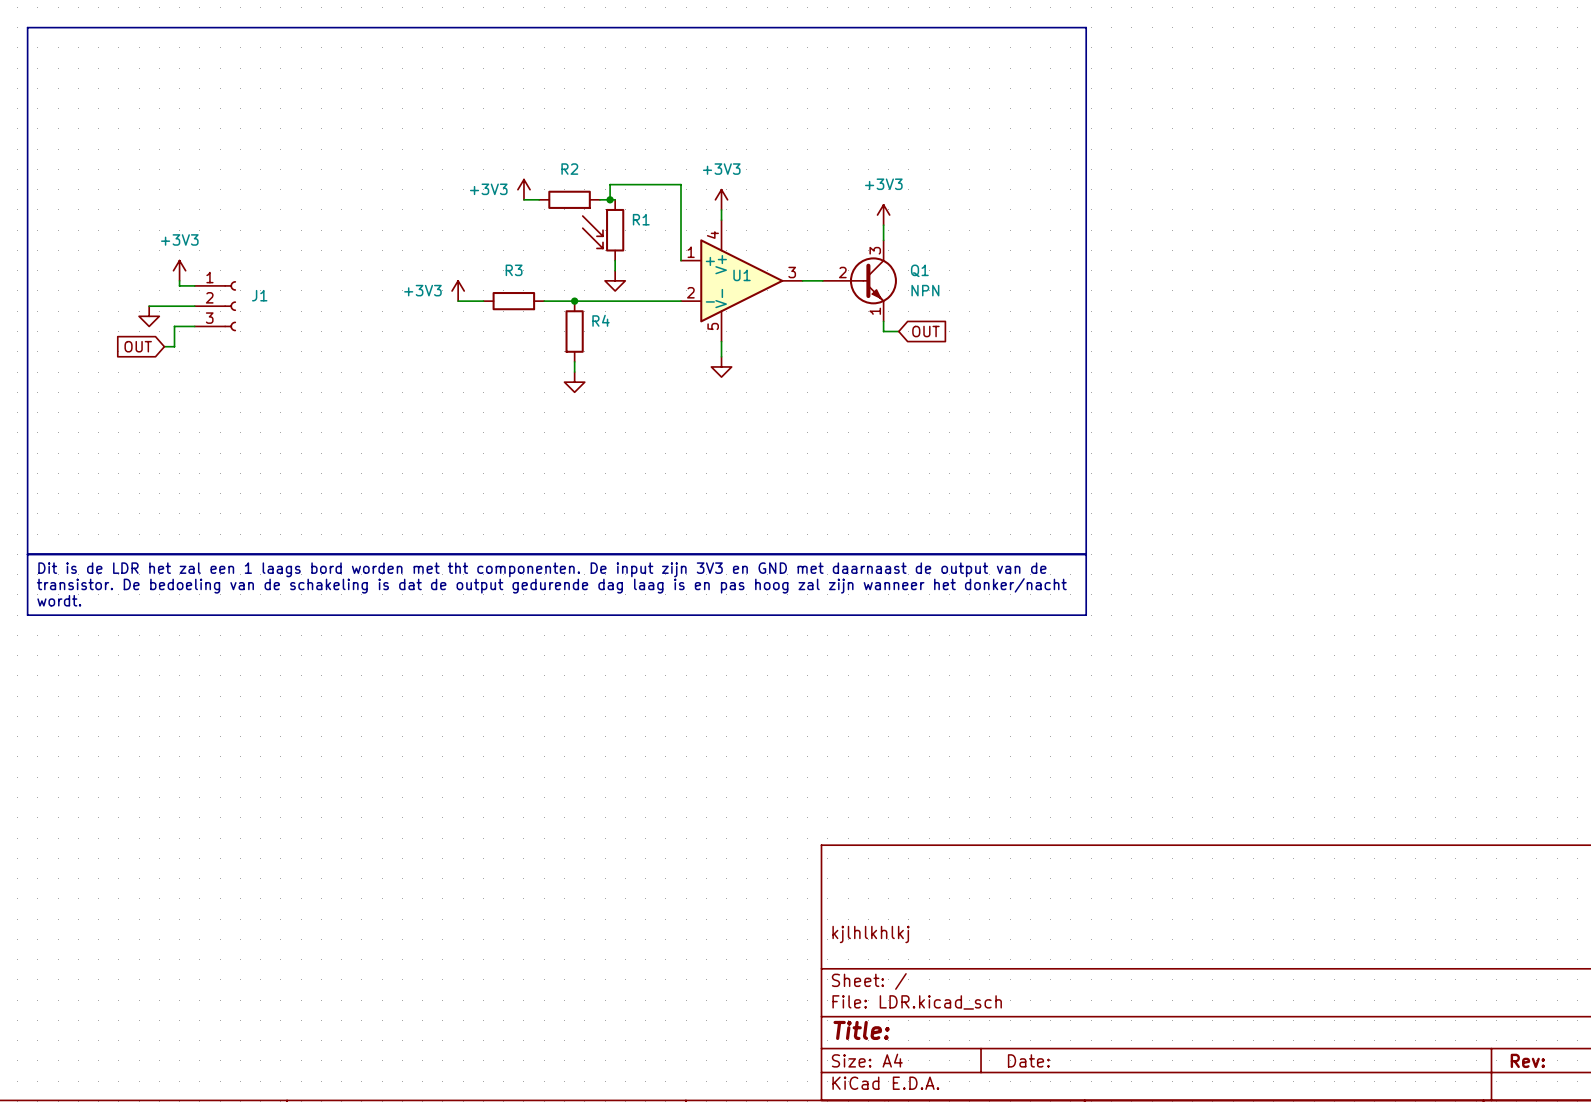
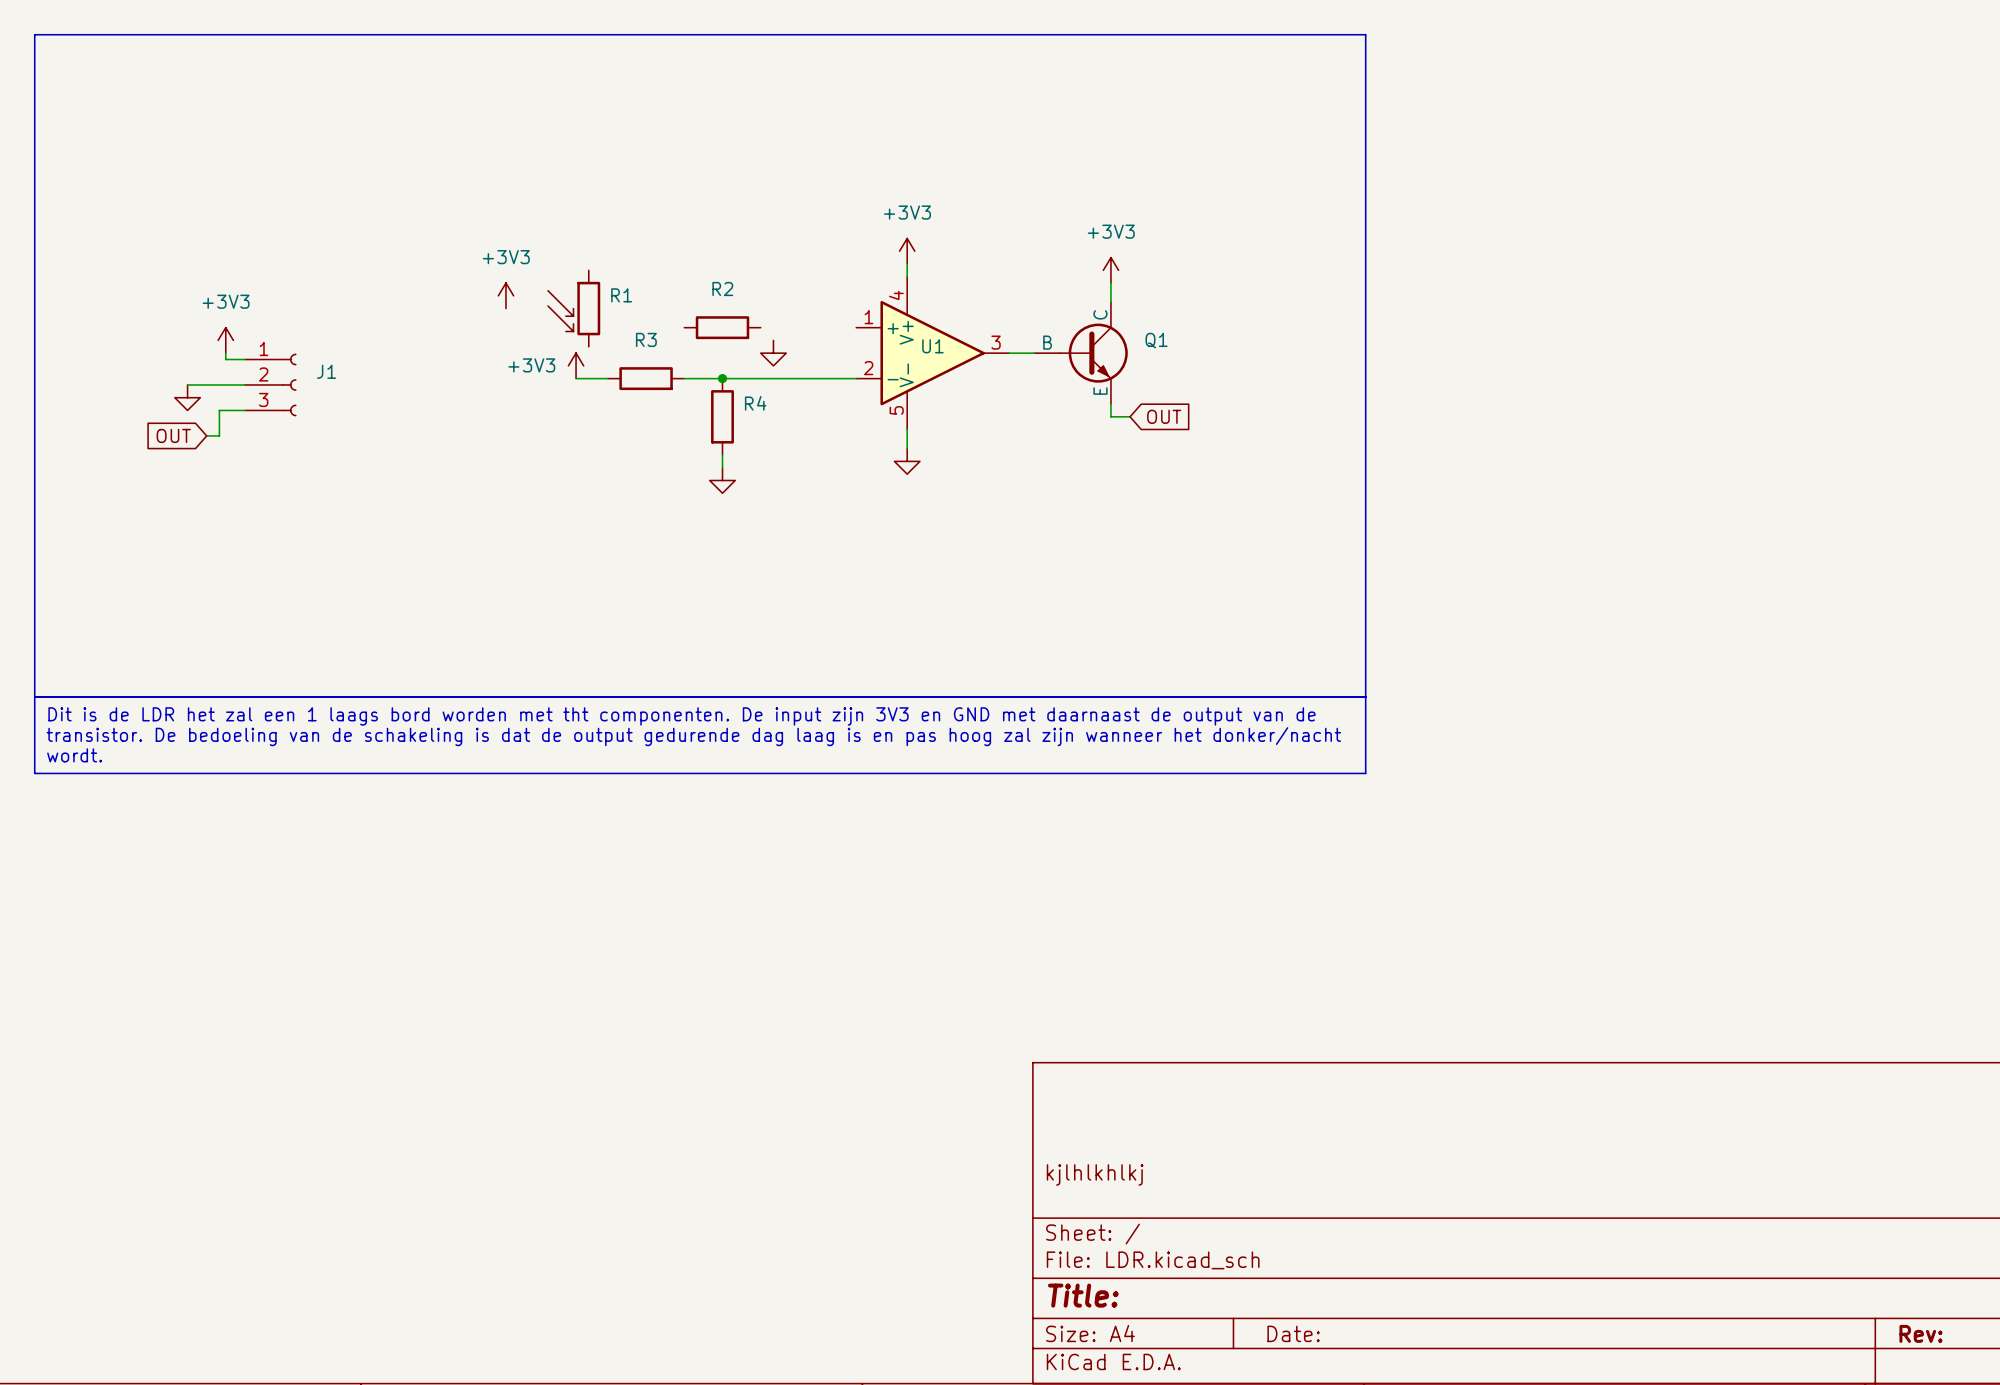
power symbol text position: +3V3 (488, 189) -> +3V3 (506, 257)
power symbol position: +3V3 (523, 189) -> +3V3 (505, 295)
wire: (523, 199) (539, 199) -> none
R2 position: (569, 199) -> (722, 327)
wire: (599, 199) (615, 199) -> none
wire: (610, 199) (610, 184) (680, 184) (680, 260) -> none
junction: (610, 199) -> none
R1 position: (603, 230) -> (574, 308)
Q1 symbol: [822, 240, 897, 322] -> [1034, 302, 1128, 405]
wire: (615, 260) (615, 270) -> none
Q1 value: NPN (925, 290) -> none

